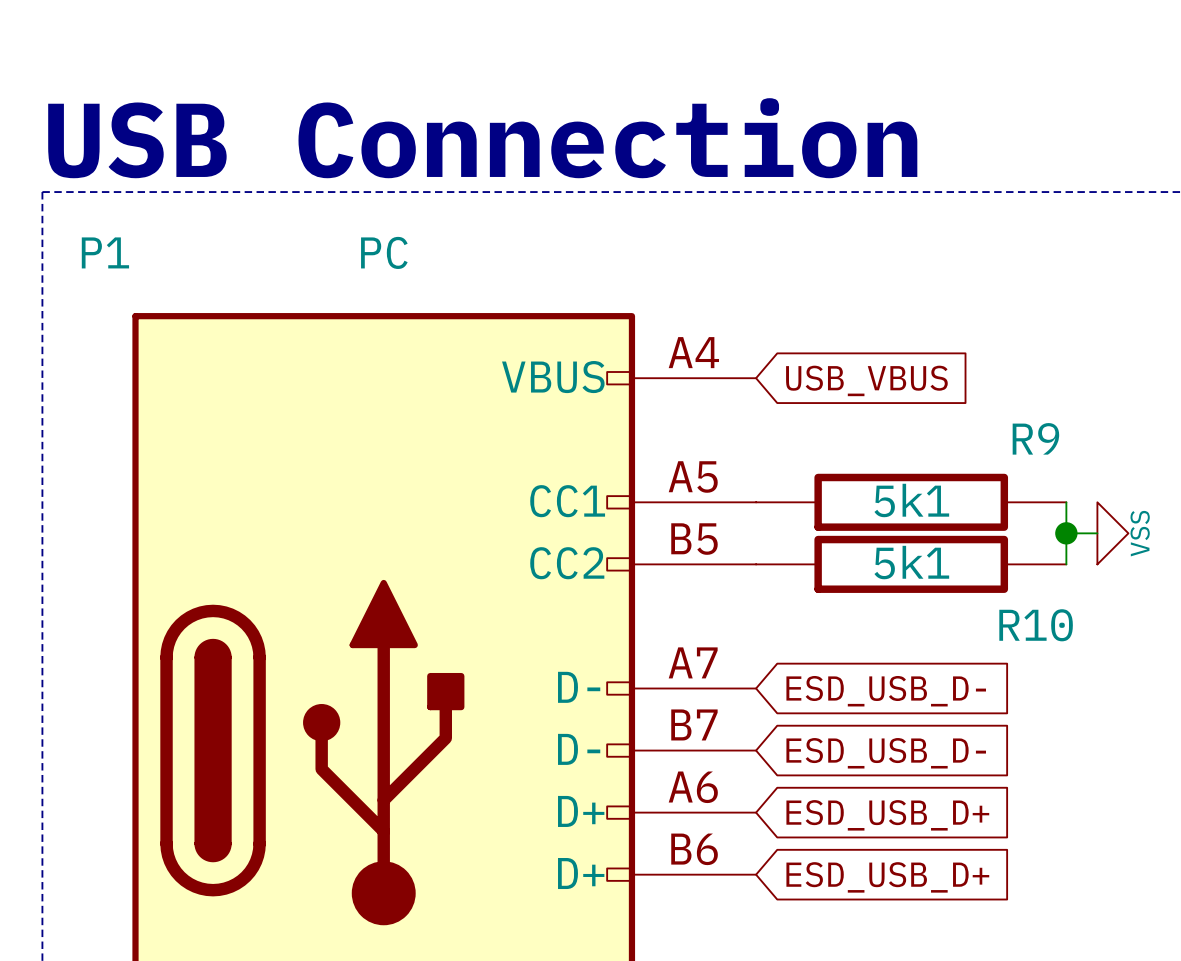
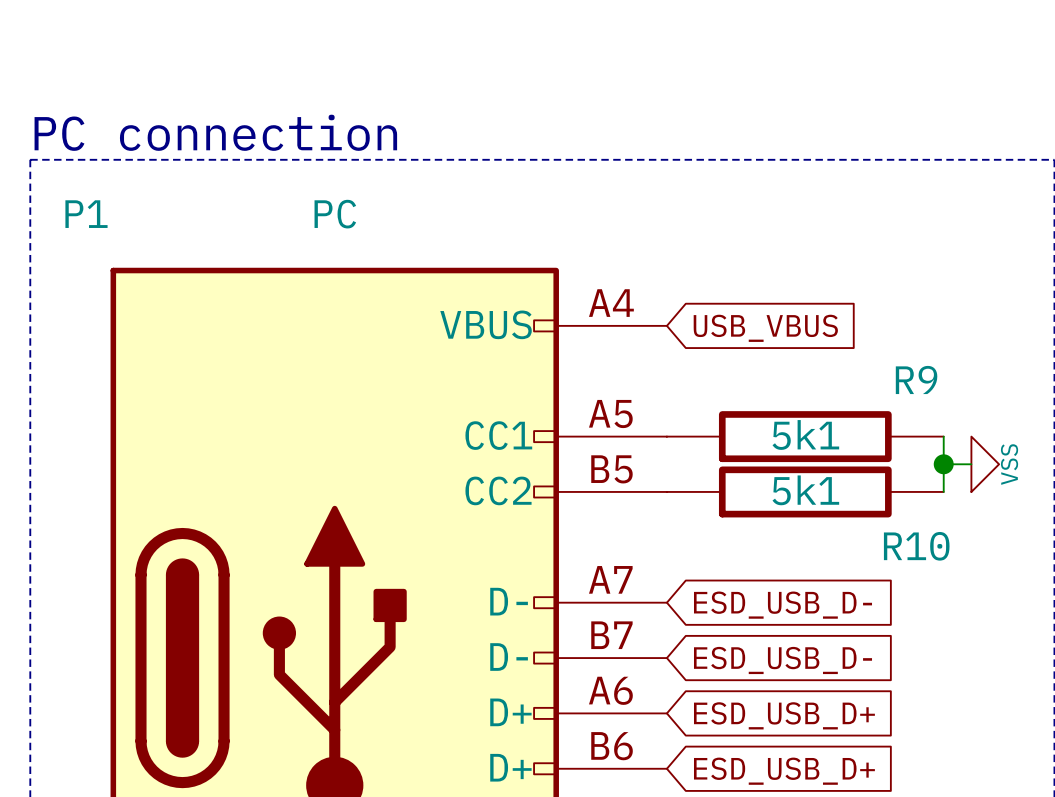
text: USB Connection (482, 138) -> PC connection (215, 132)

